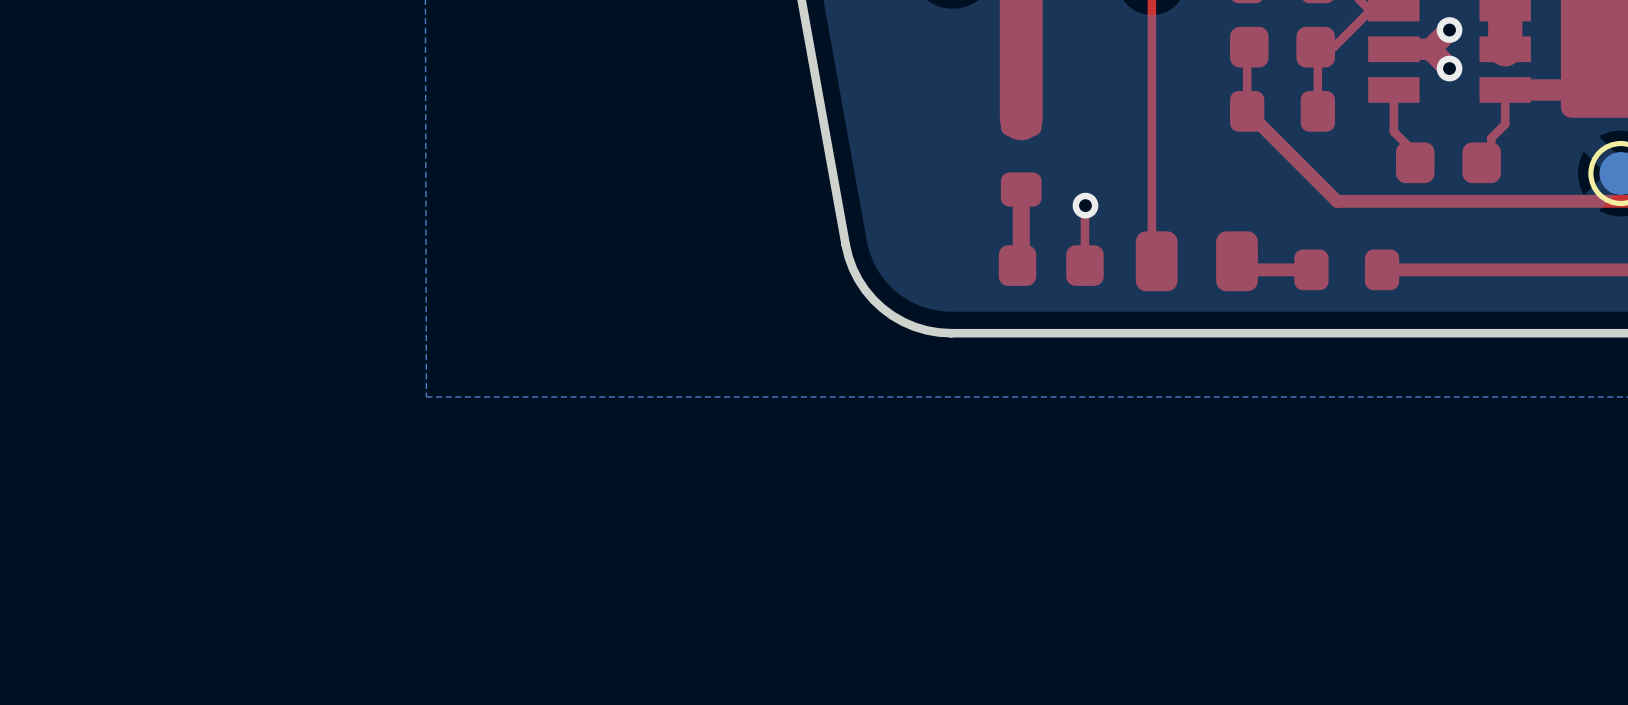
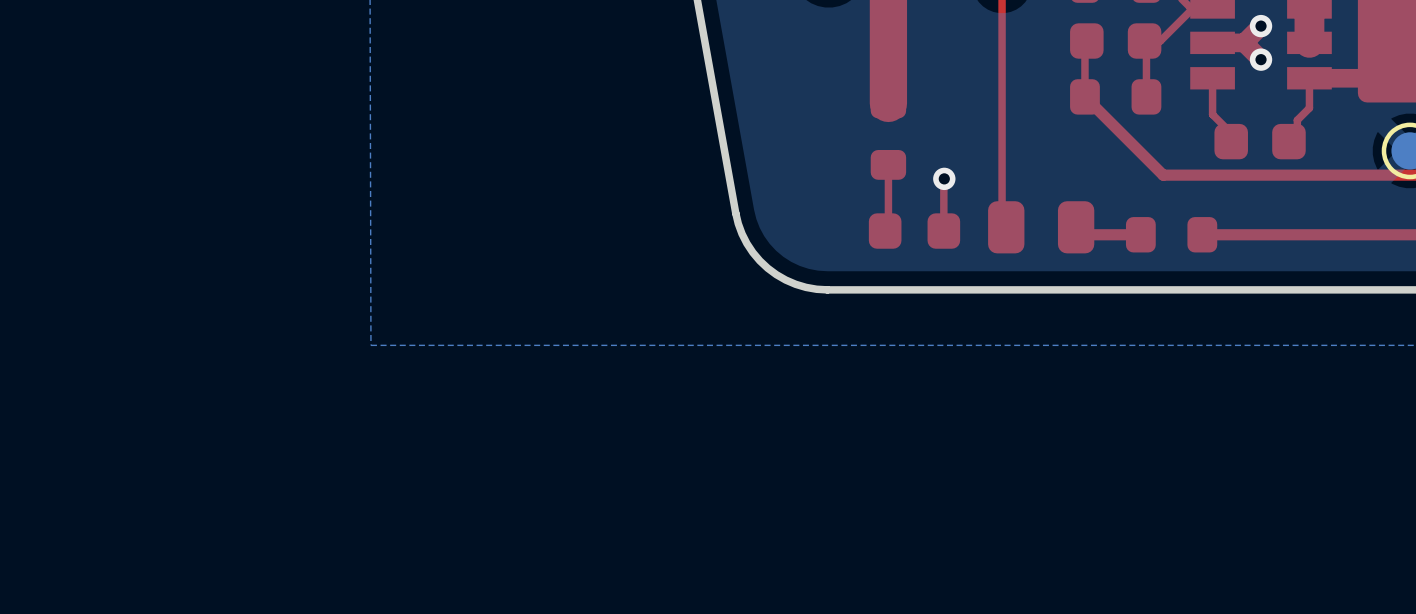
top track width: thick (1021, 189) (1021, 261) -> thin (888, 164) (888, 227)

